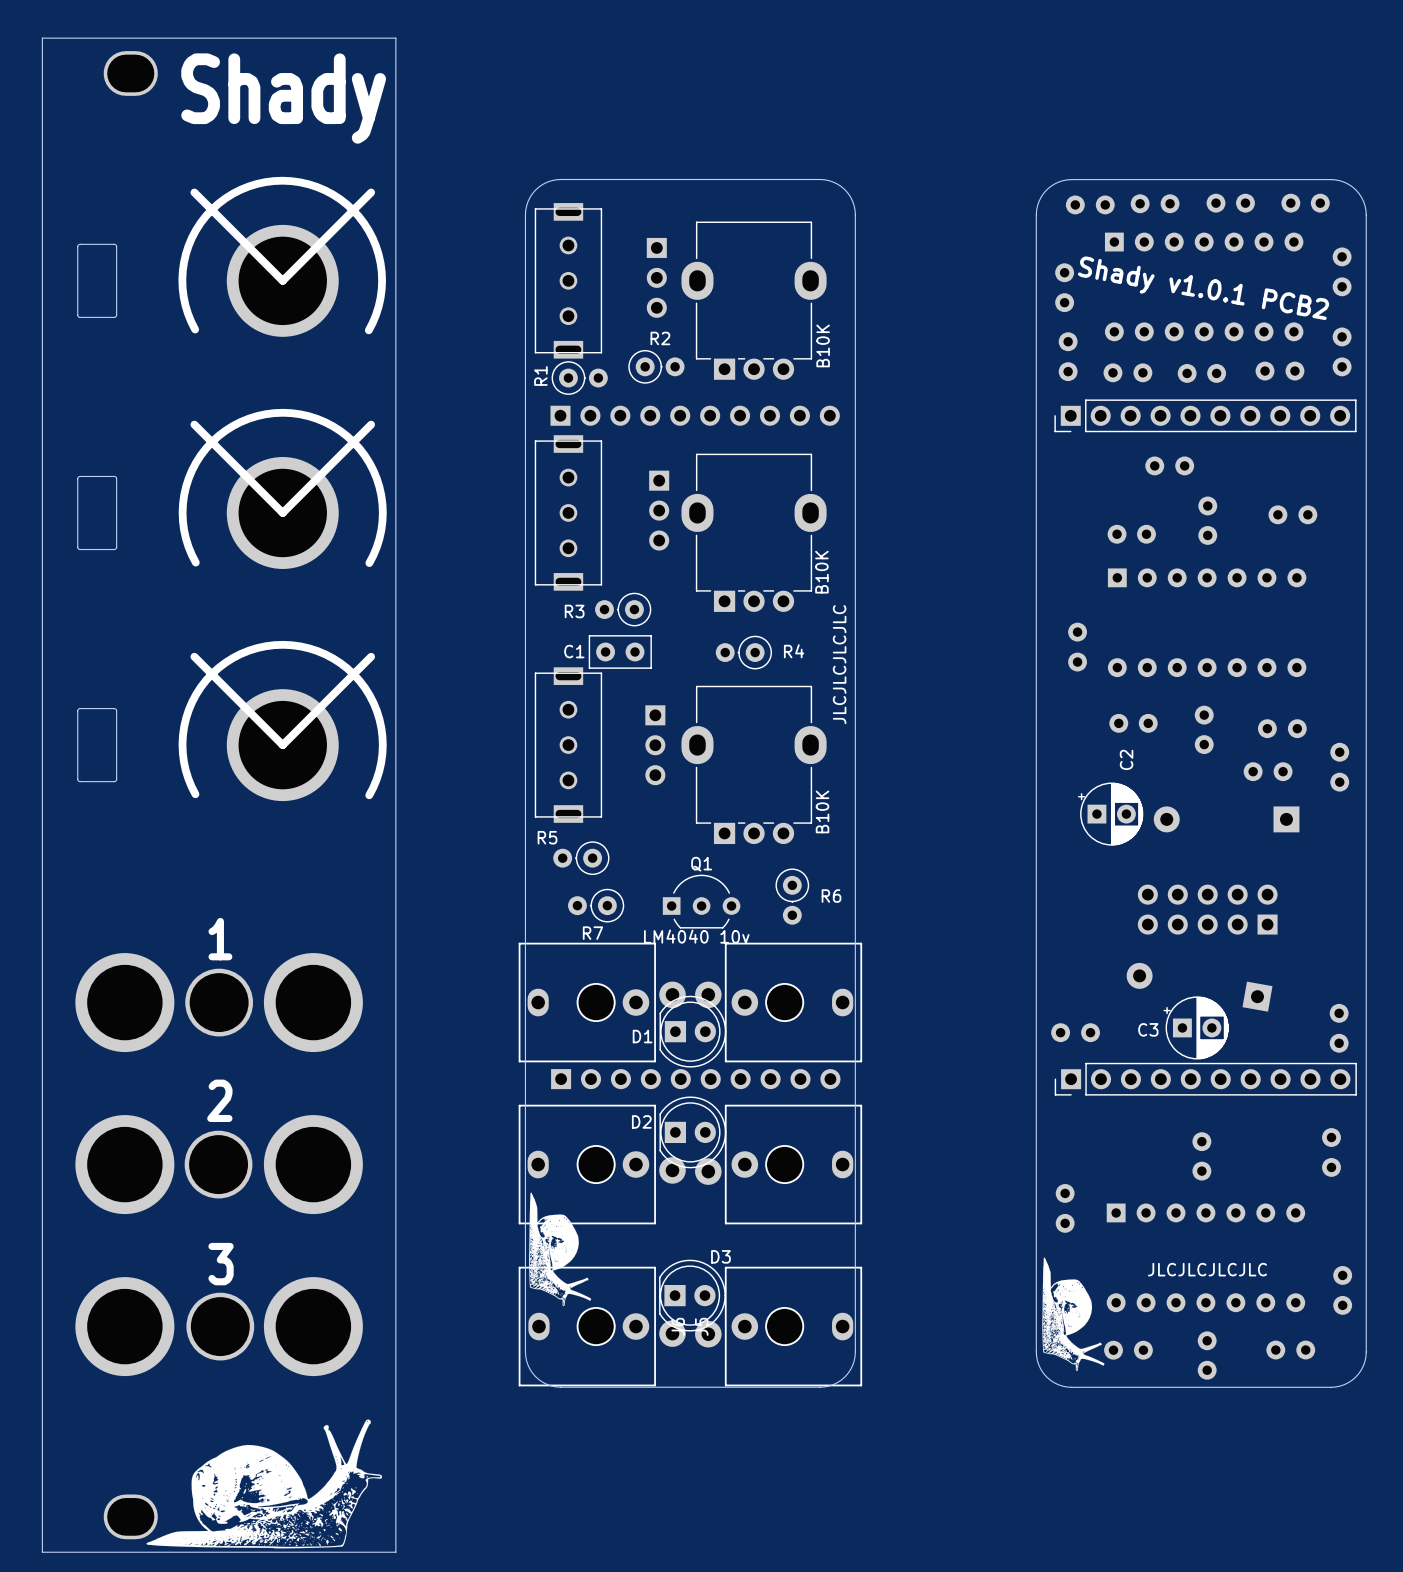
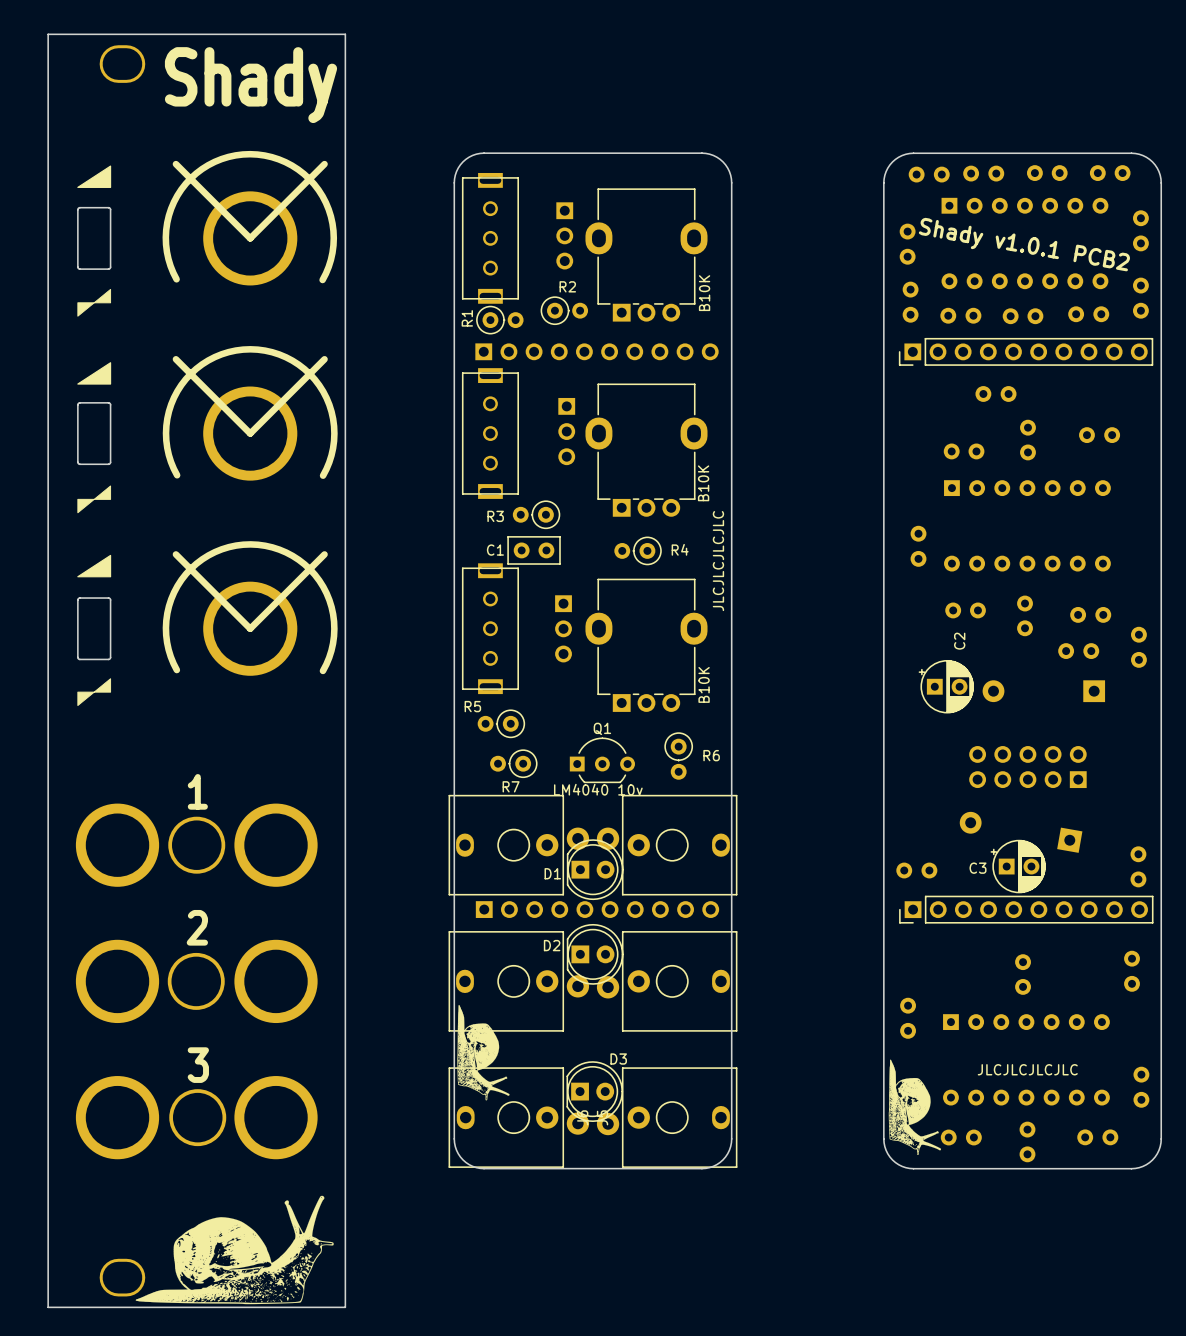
drawing: none -> [77, 165, 112, 188]
drawing: none -> [77, 288, 112, 317]
drawing: none -> [77, 362, 112, 385]
drawing: none -> [77, 485, 112, 514]
drawing: none -> [77, 554, 112, 578]
drawing: none -> [77, 678, 112, 707]

